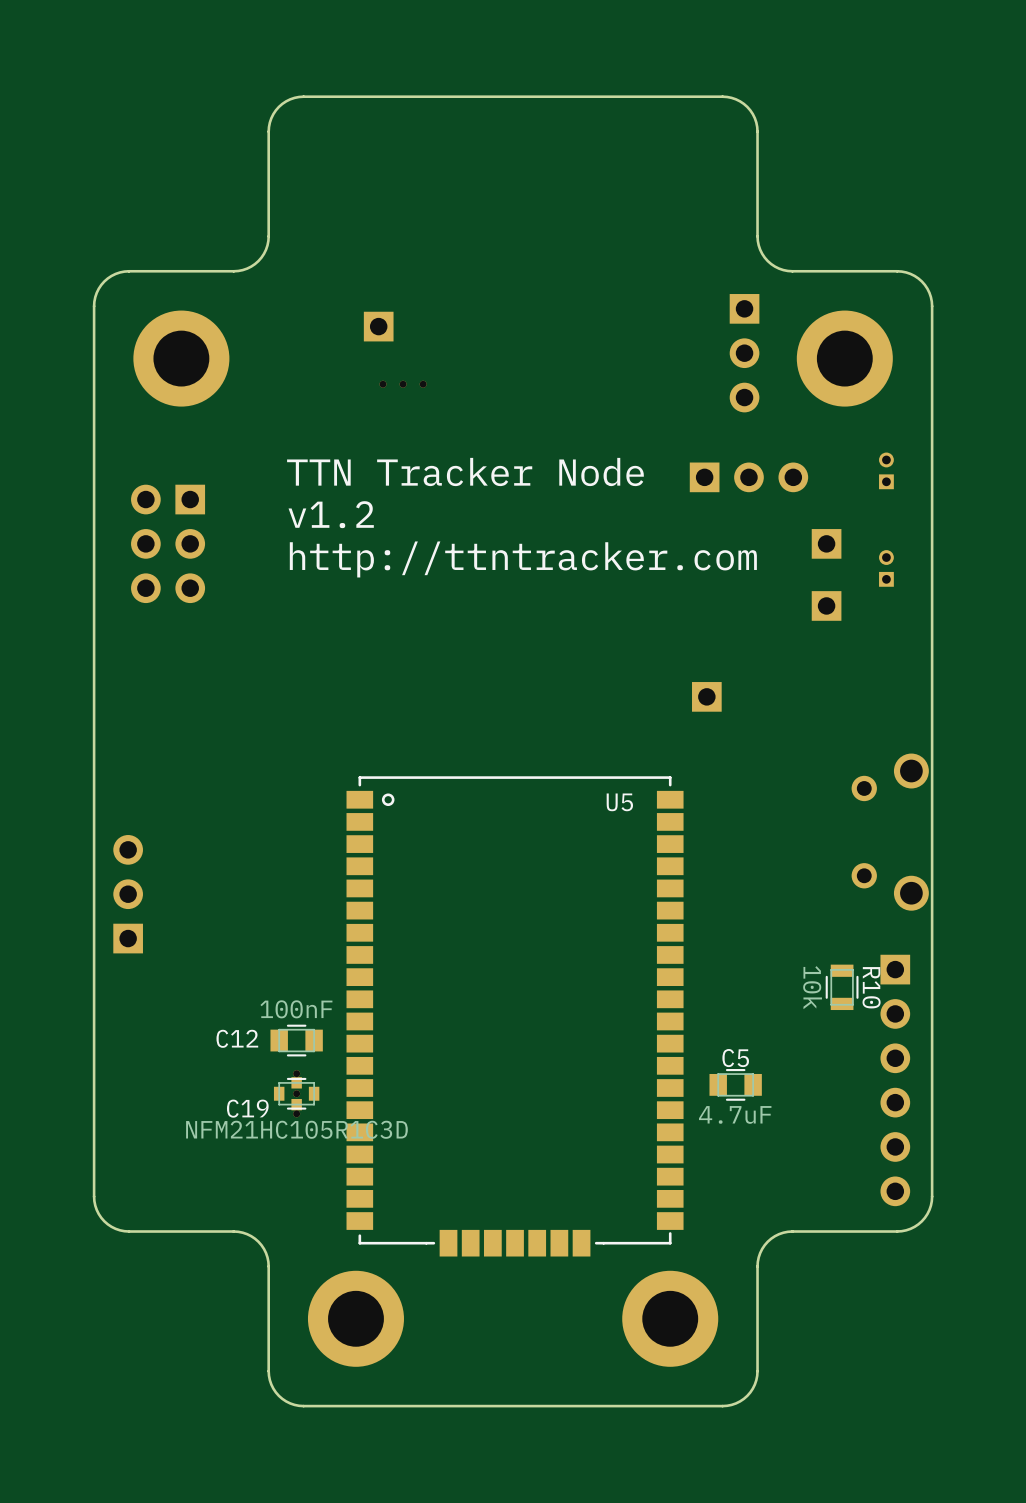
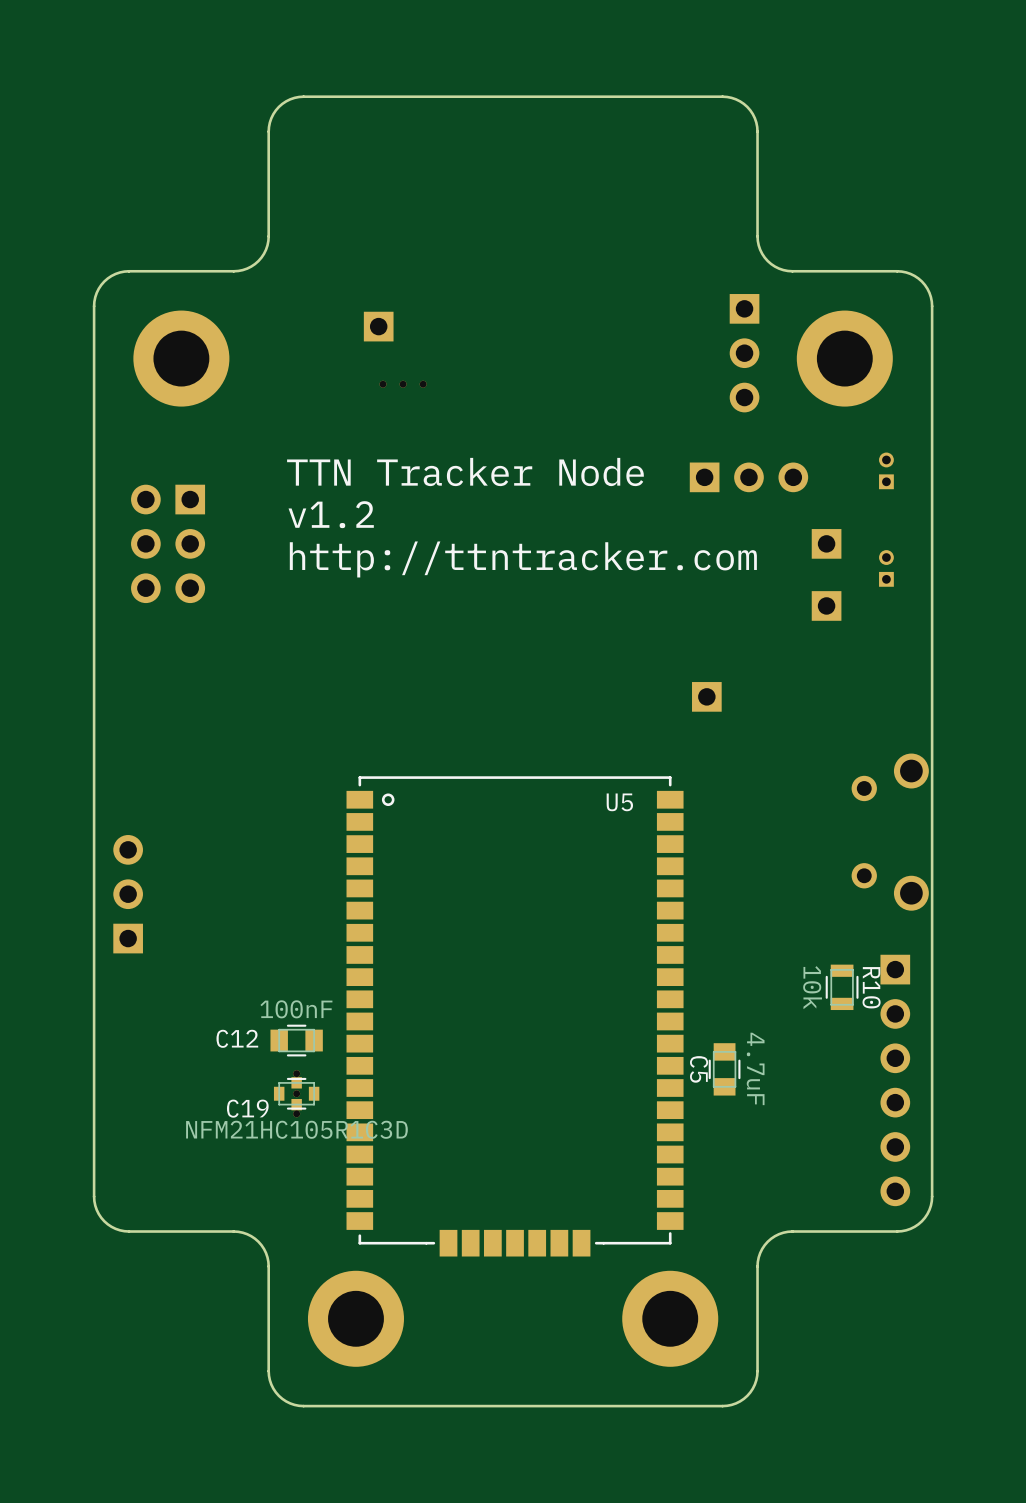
C5 name position: C5 (735, 1058) -> C5 (699, 1069)
C5 rotation: 0° (735, 1084) -> 90° clockwise (724, 1069)
C5 value position: 4.7uF (735, 1114) -> 4.7uF (755, 1068)

